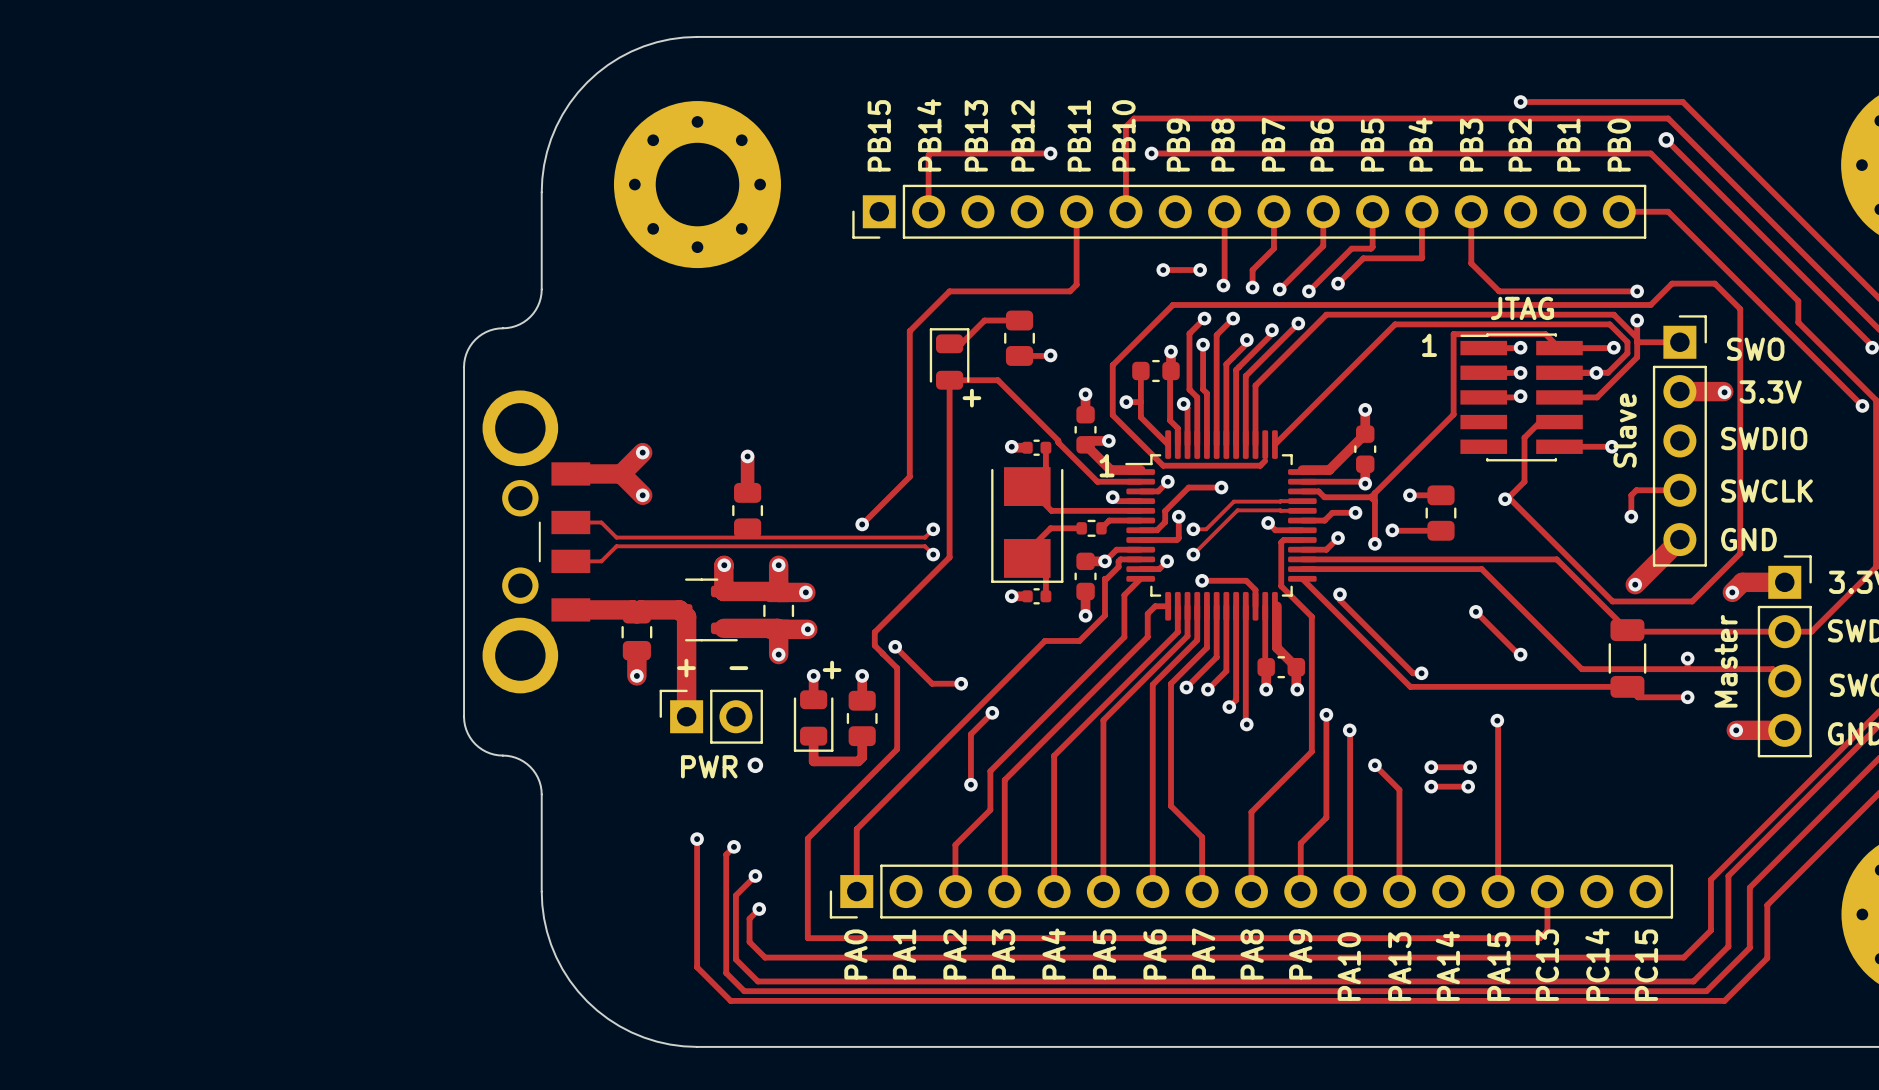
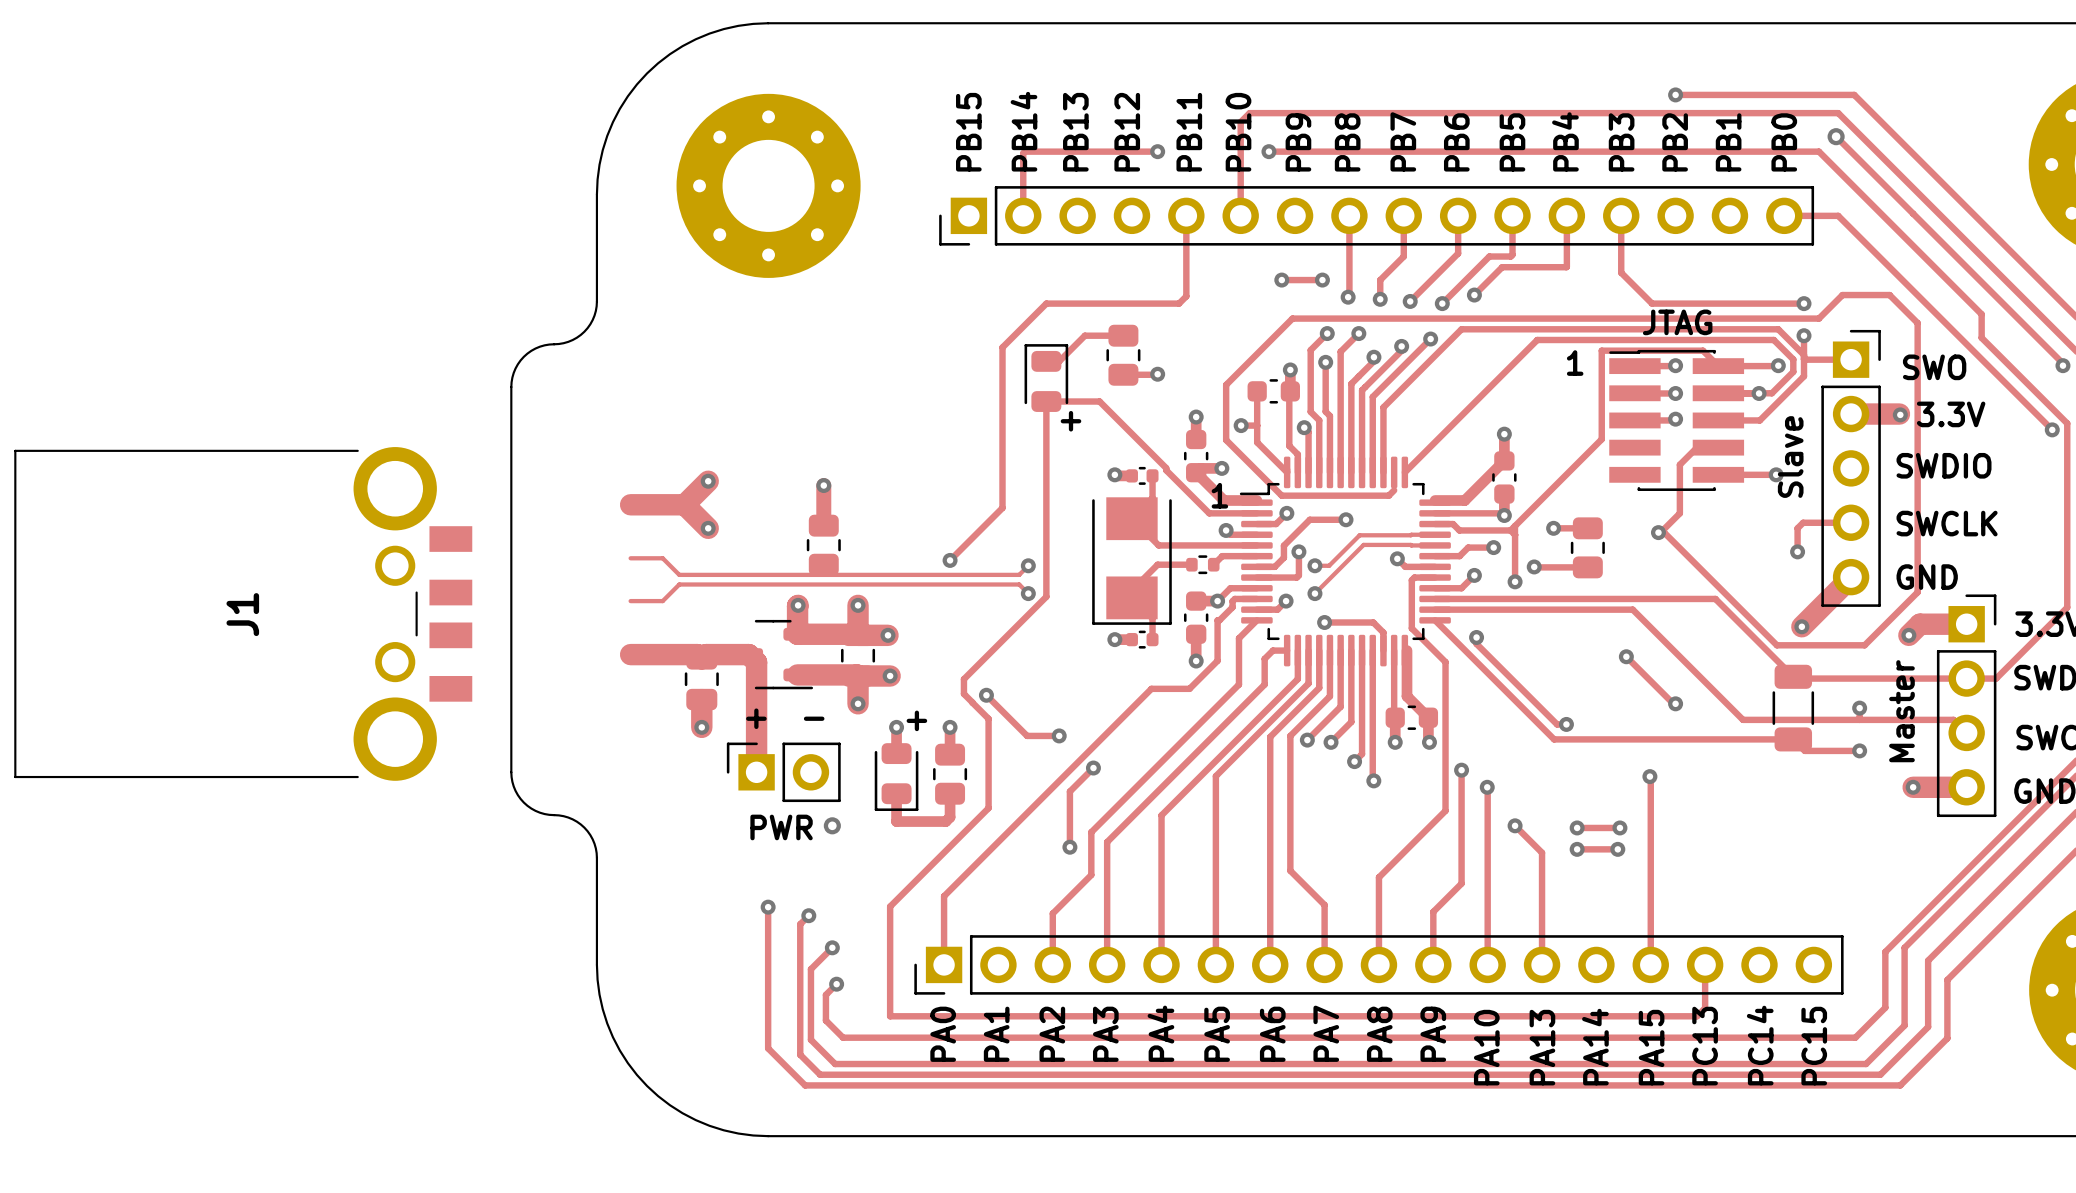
part: (536, 541) -> none
J1: none -> (243, 613)

